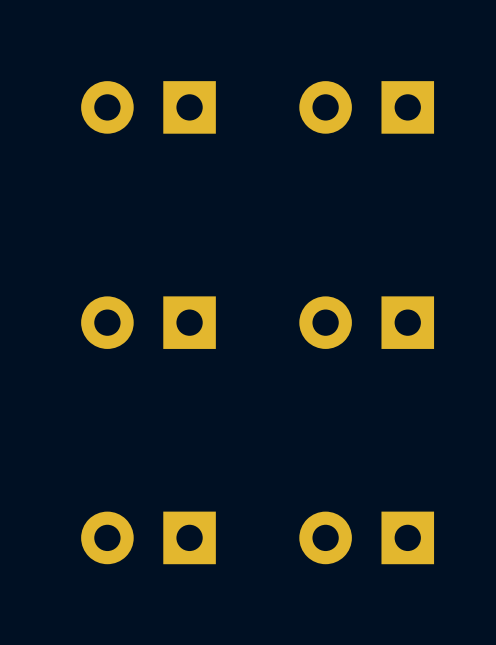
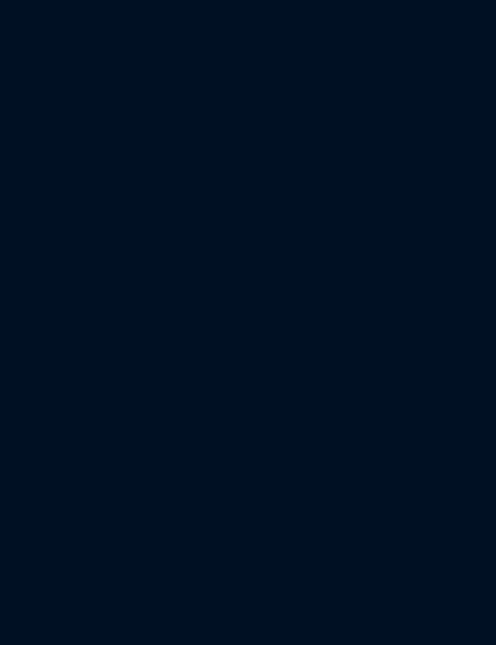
part: (148, 107) -> none
part: (366, 107) -> none
part: (148, 322) -> none
part: (366, 322) -> none
part: (148, 537) -> none
part: (366, 537) -> none

